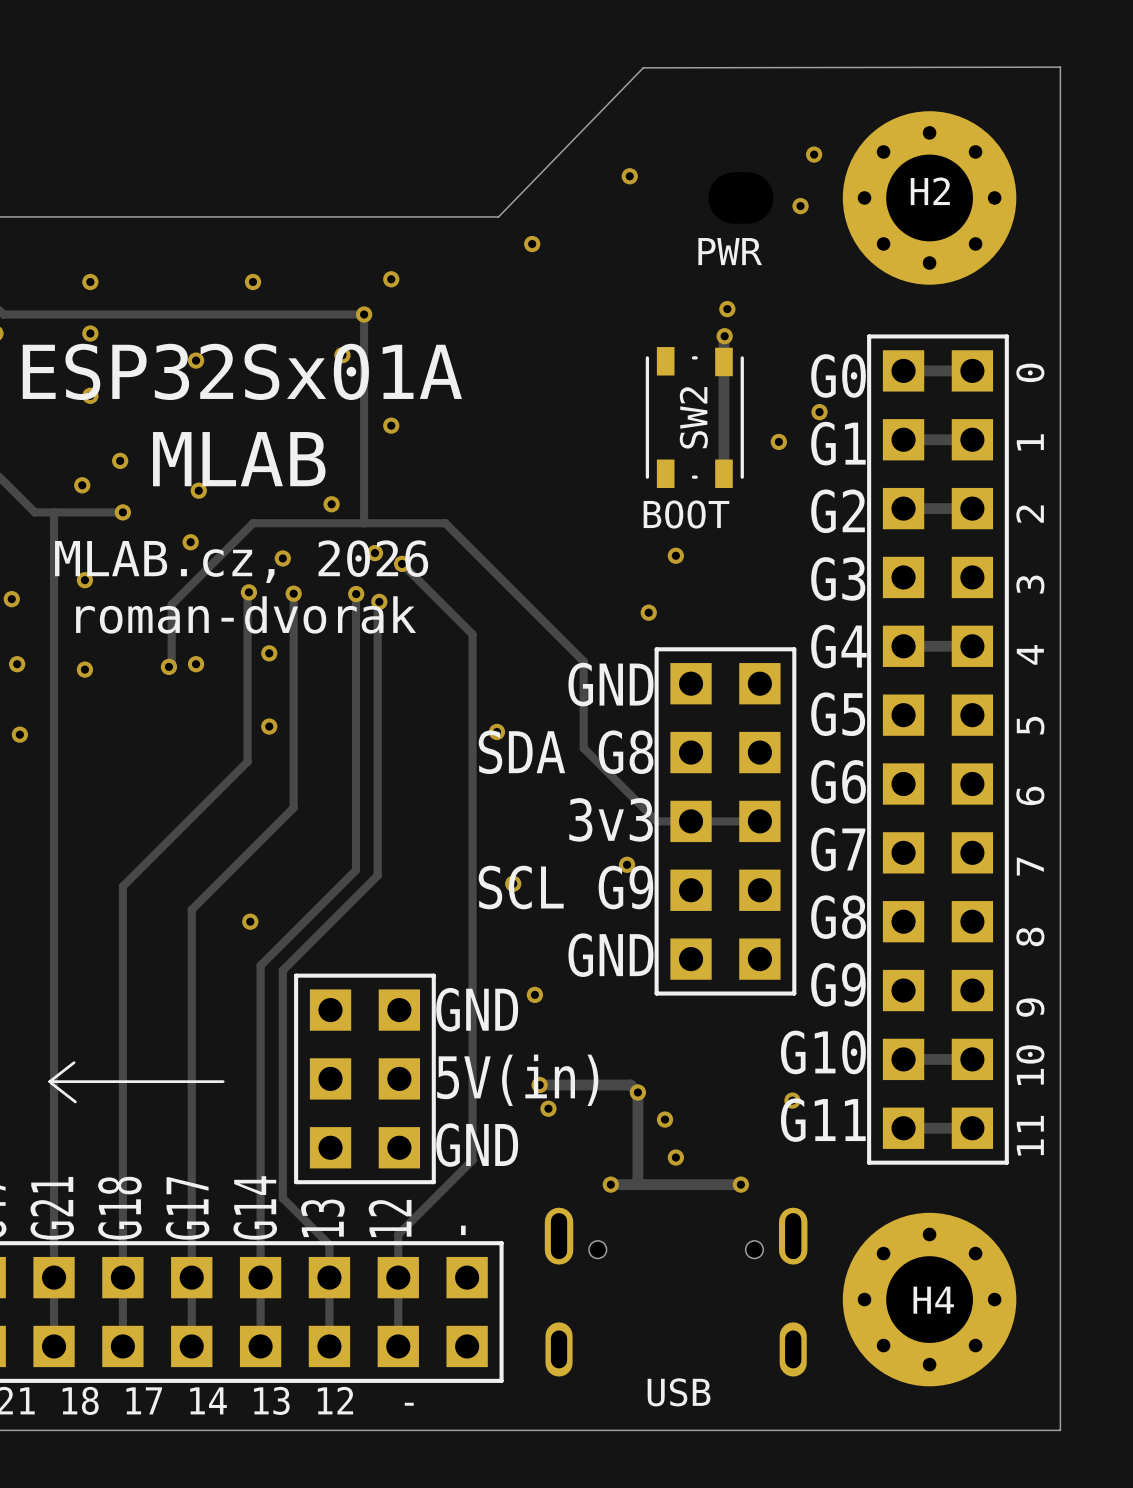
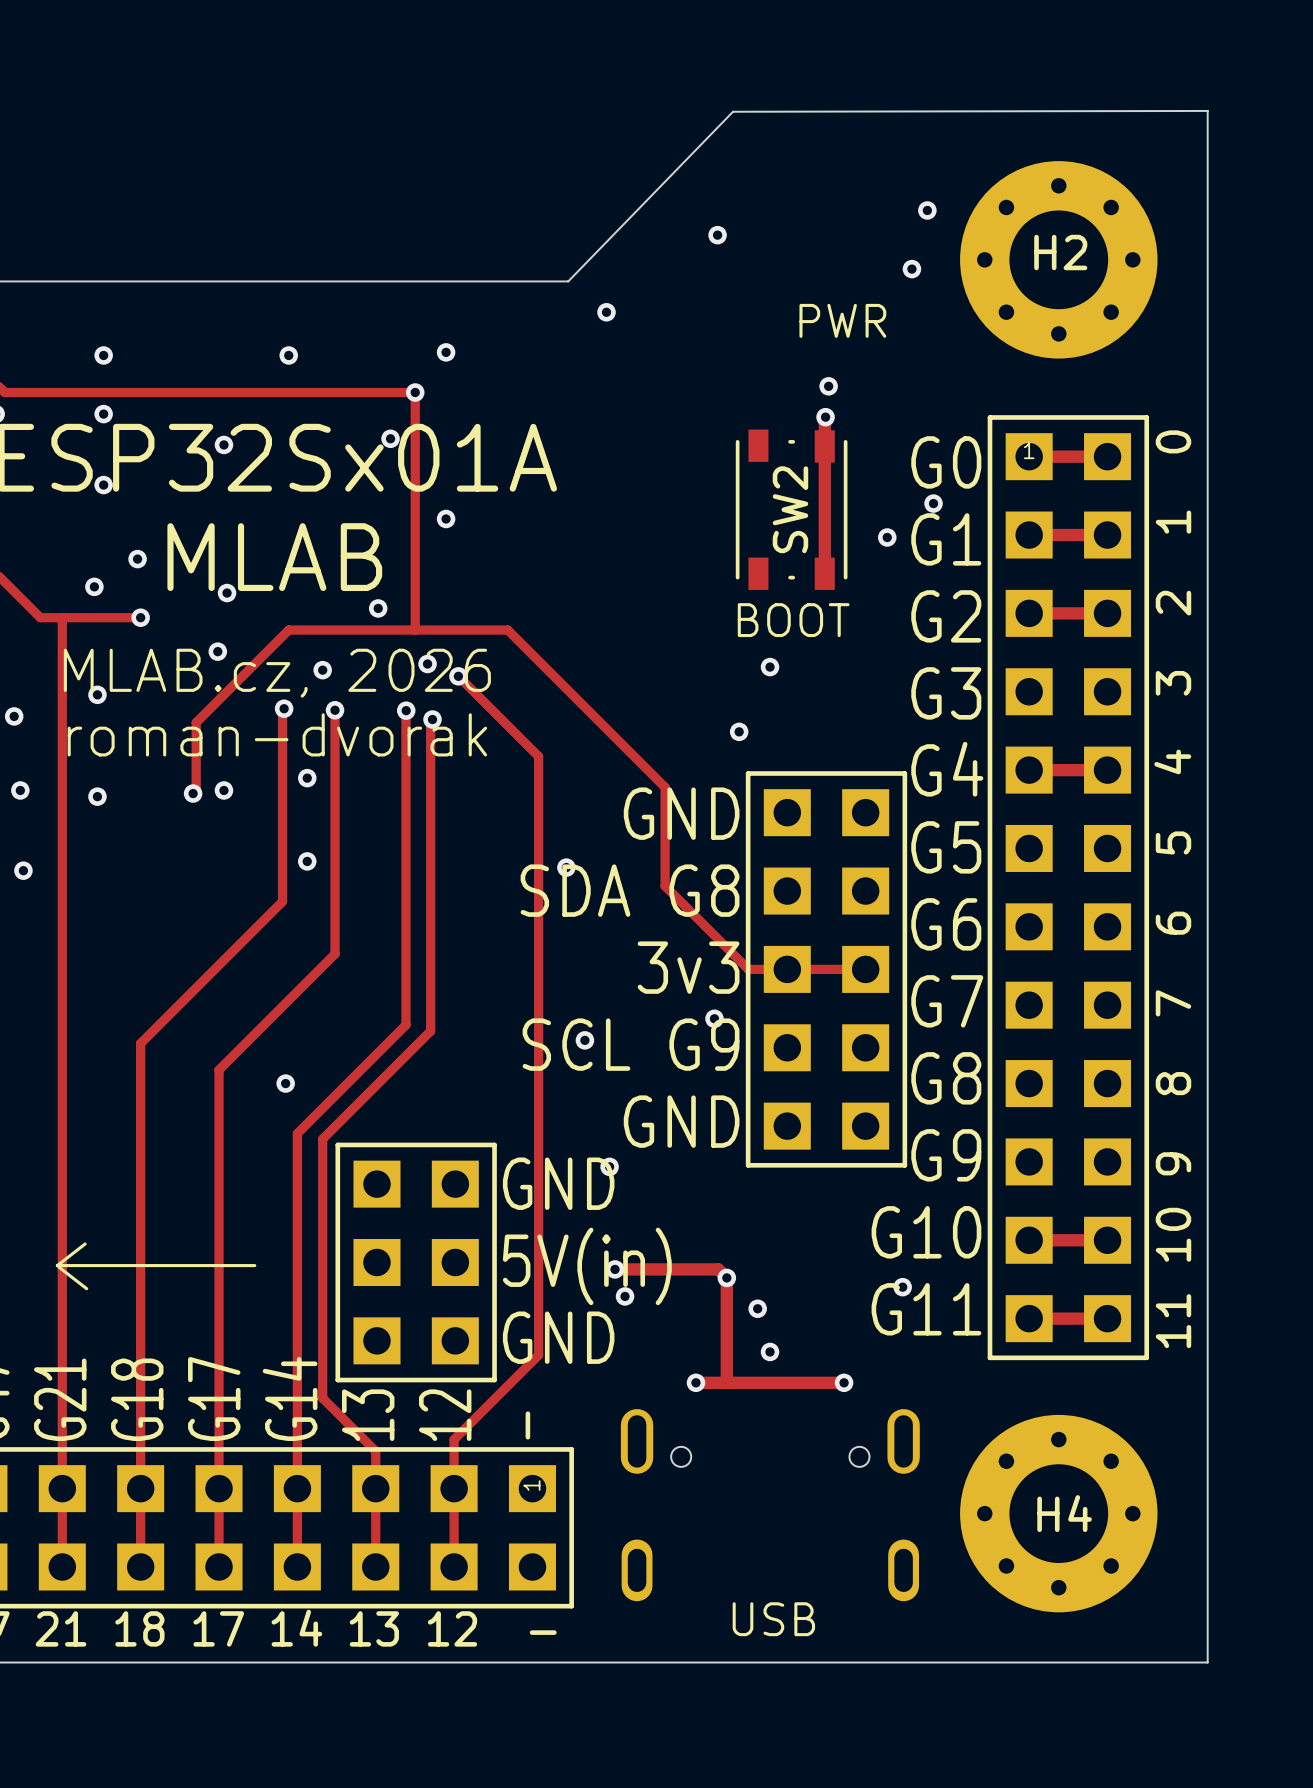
part text: none -> 1 (1029, 450)
part text: none -> 1 (531, 1485)

